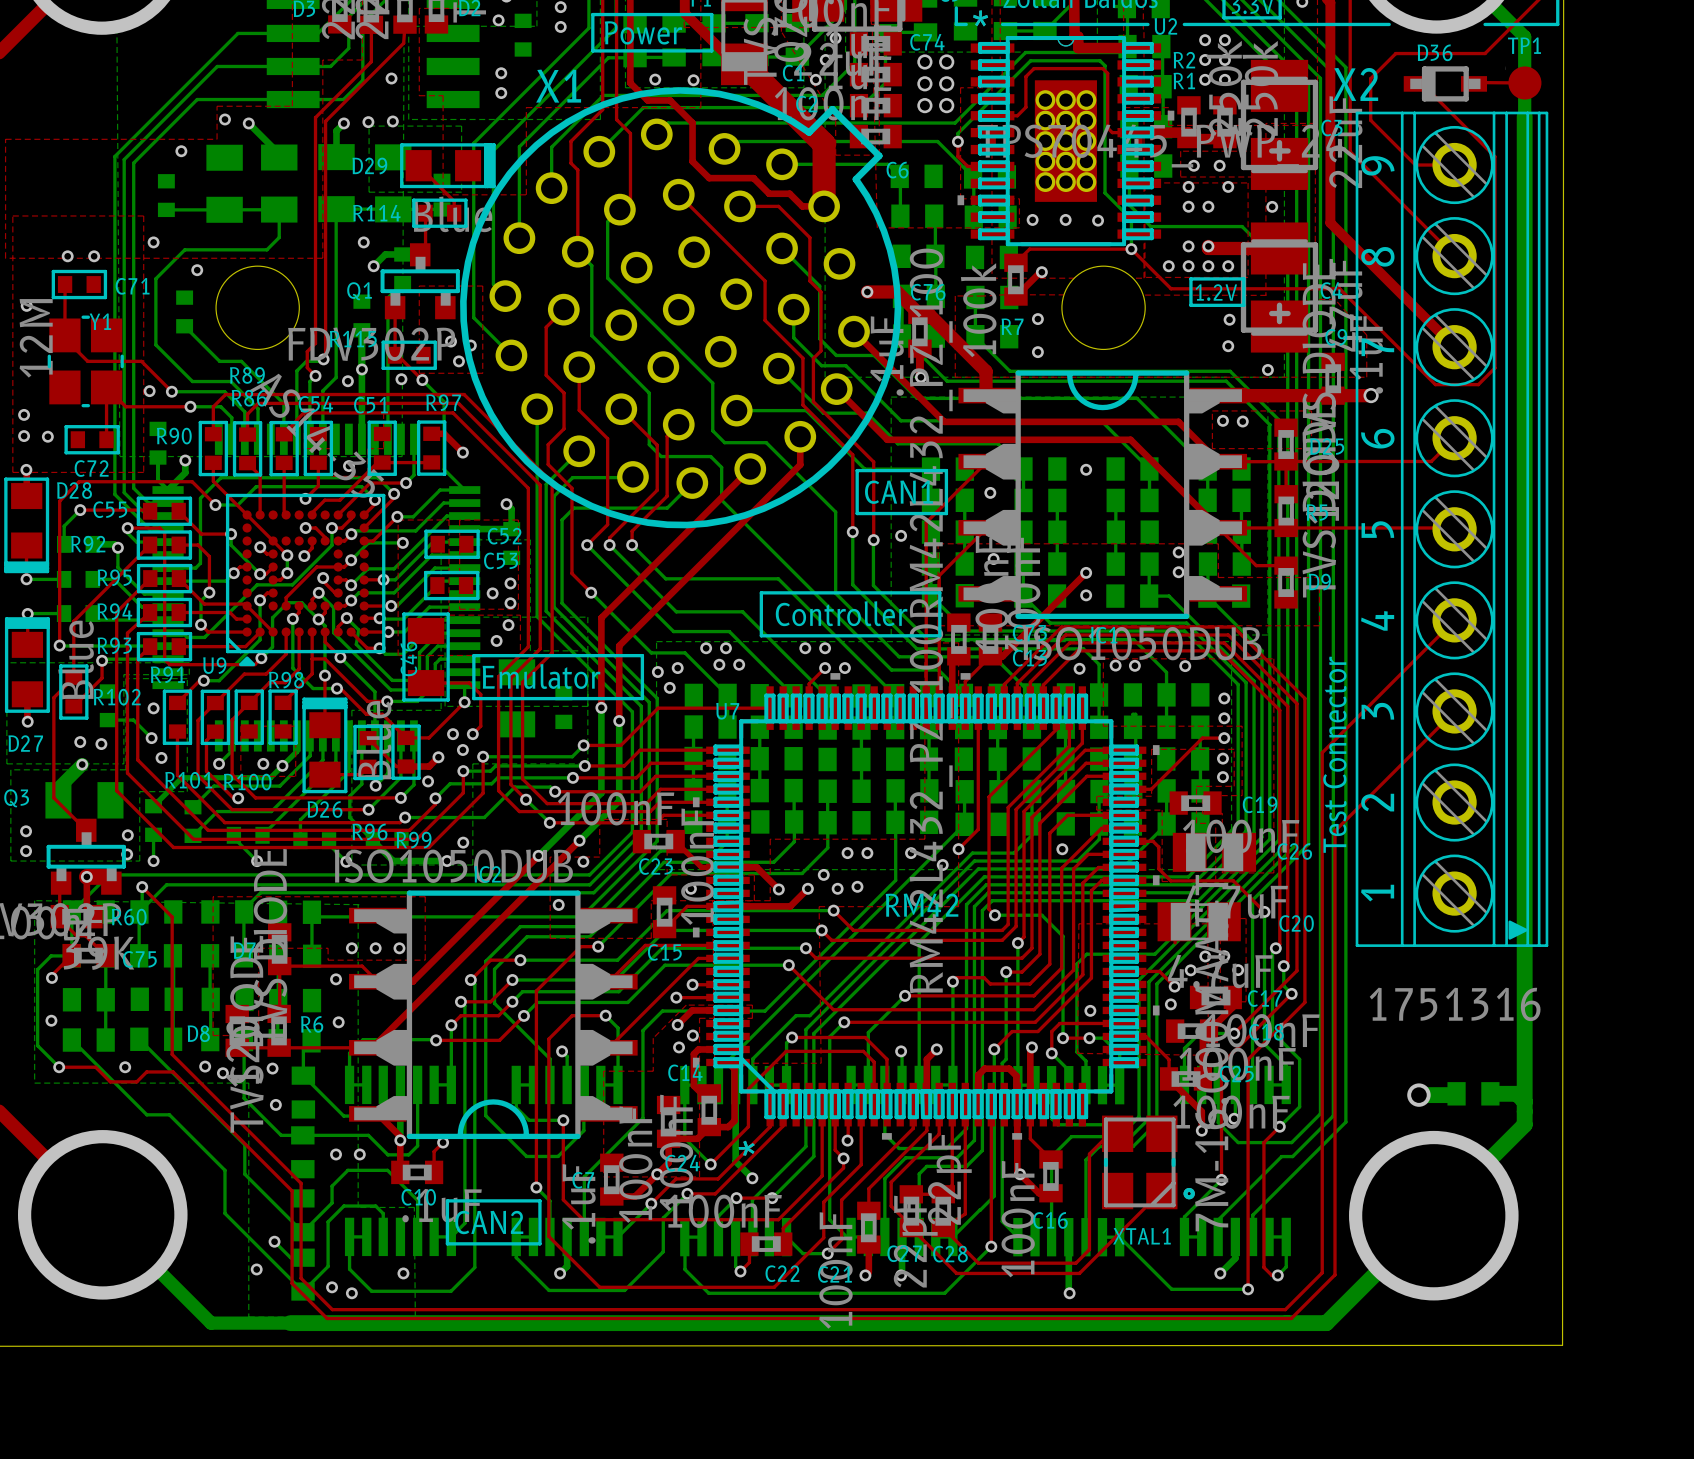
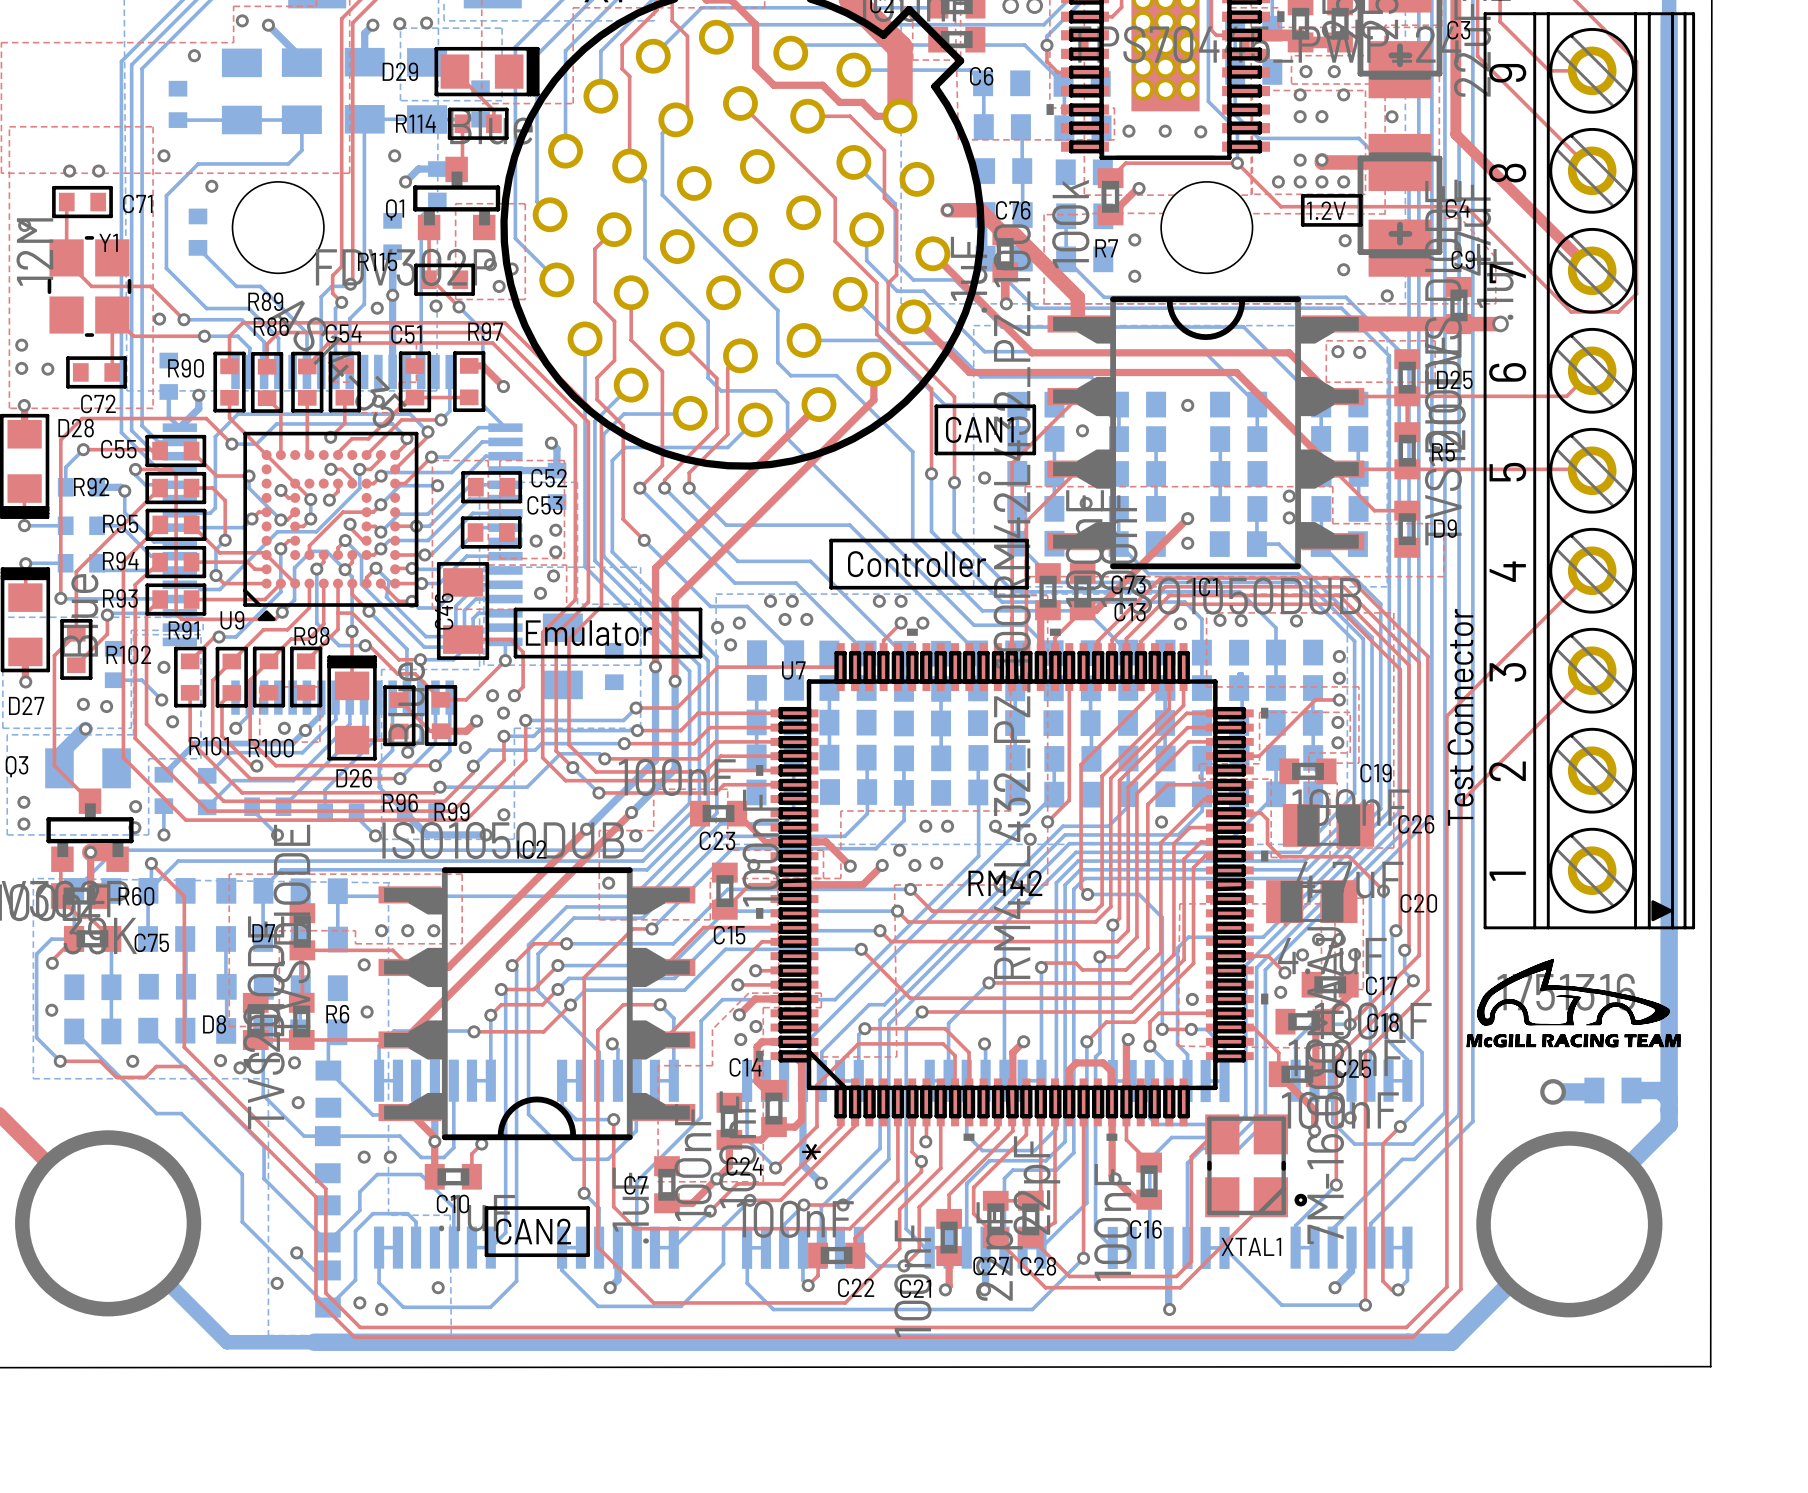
drawing: none -> [1466, 958, 1681, 1048]

